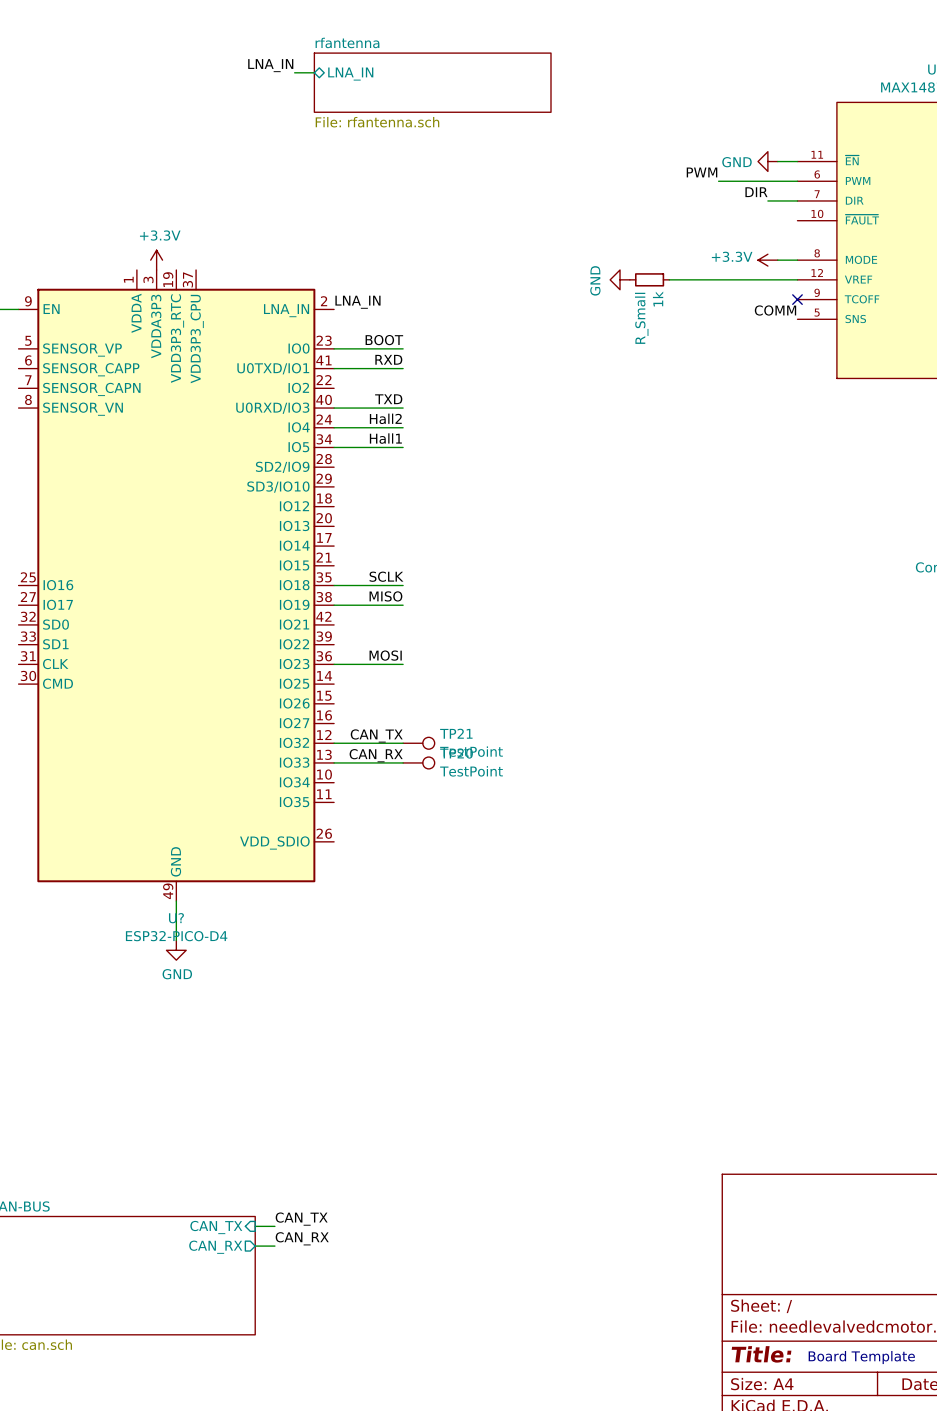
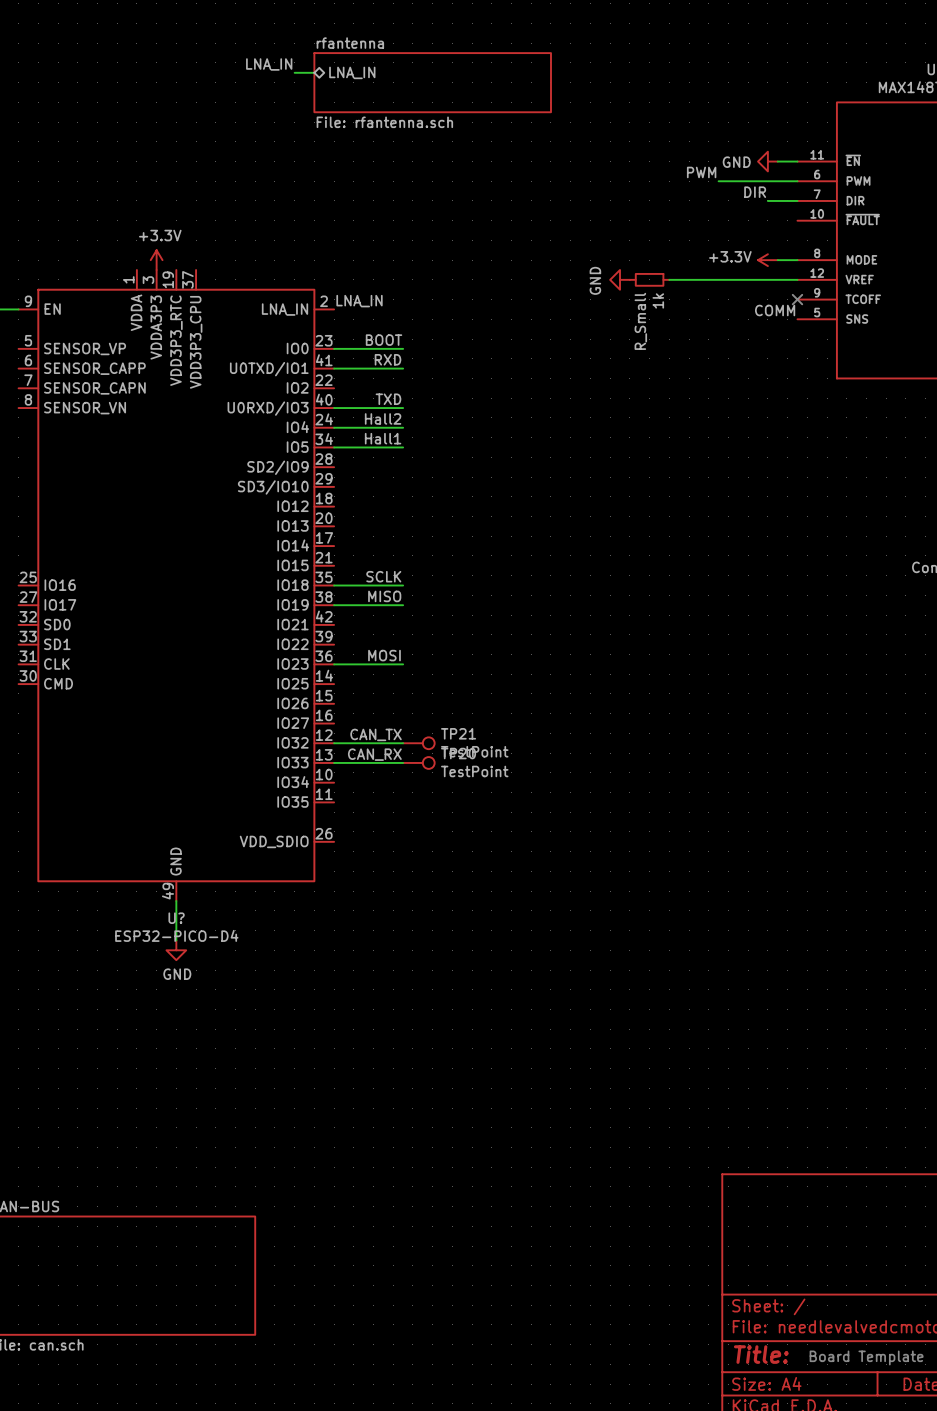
label: CAN_TX (301, 1219) -> none
wire: (255, 1226) (274, 1226) -> none
sheet pin: CAN_TX (216, 1227) -> none
label: CAN_RX (302, 1238) -> none
wire: (255, 1246) (274, 1246) -> none
sheet pin: CAN_RX (215, 1247) -> none

